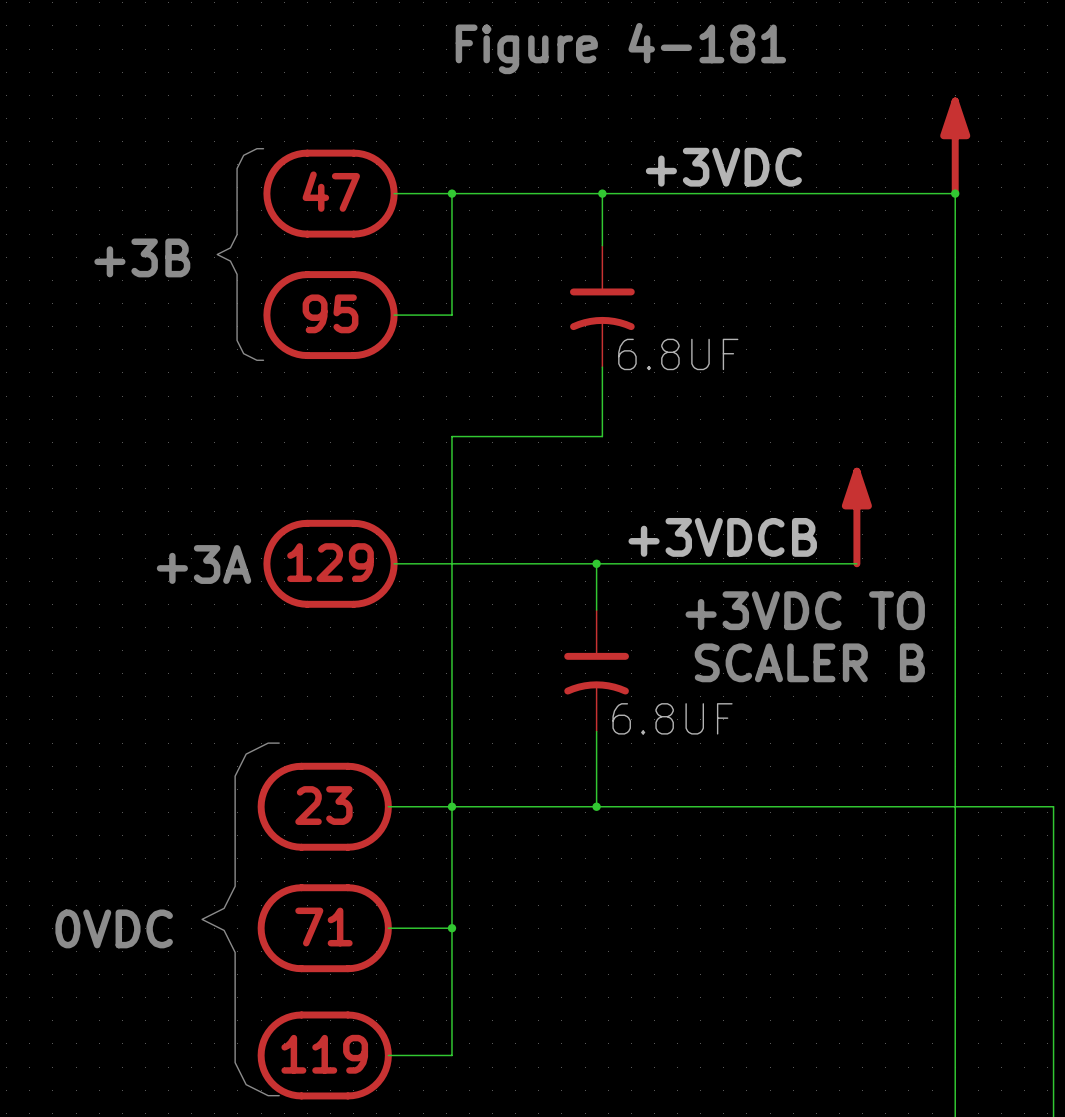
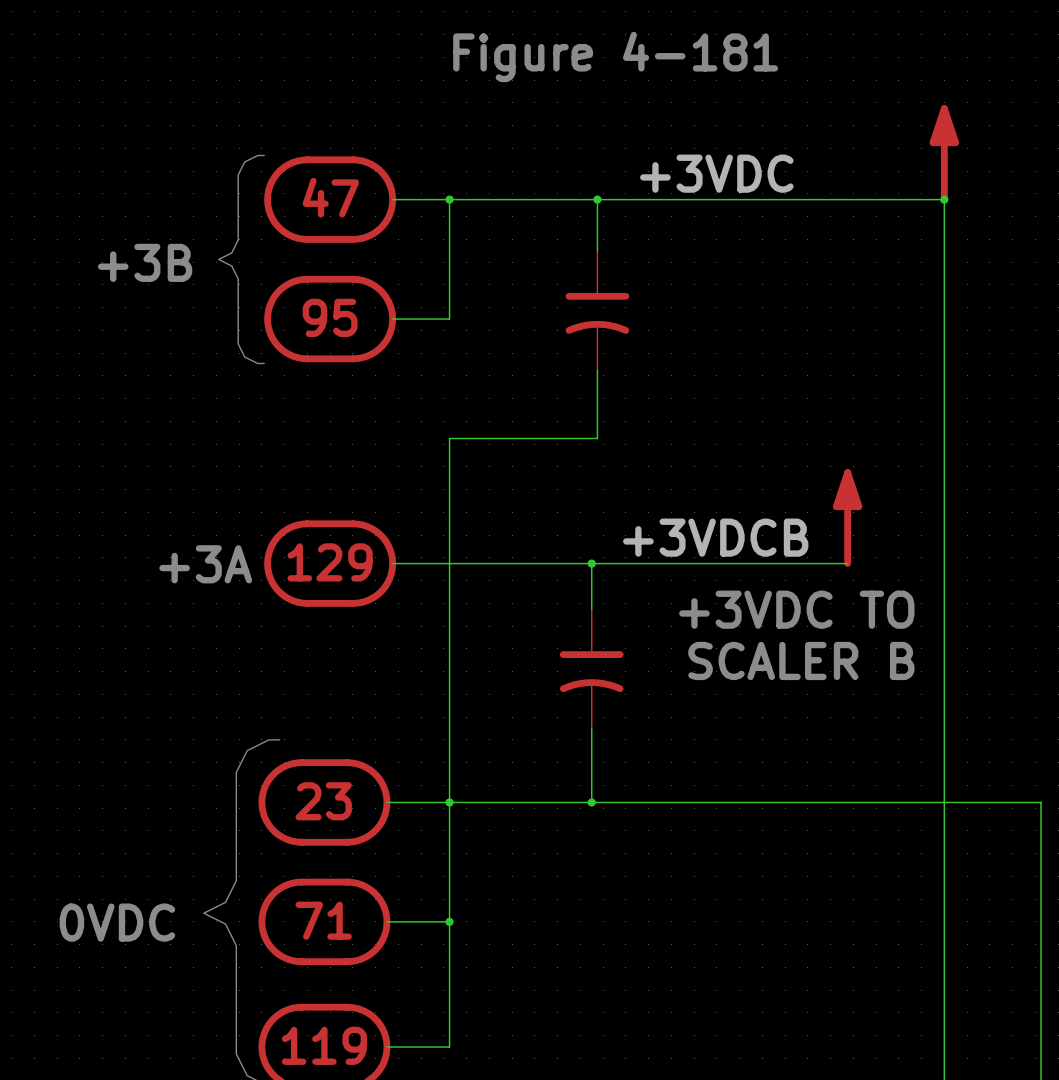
part value: 6.8UF (678, 354) -> none
part value: 6.8UF (672, 718) -> none

